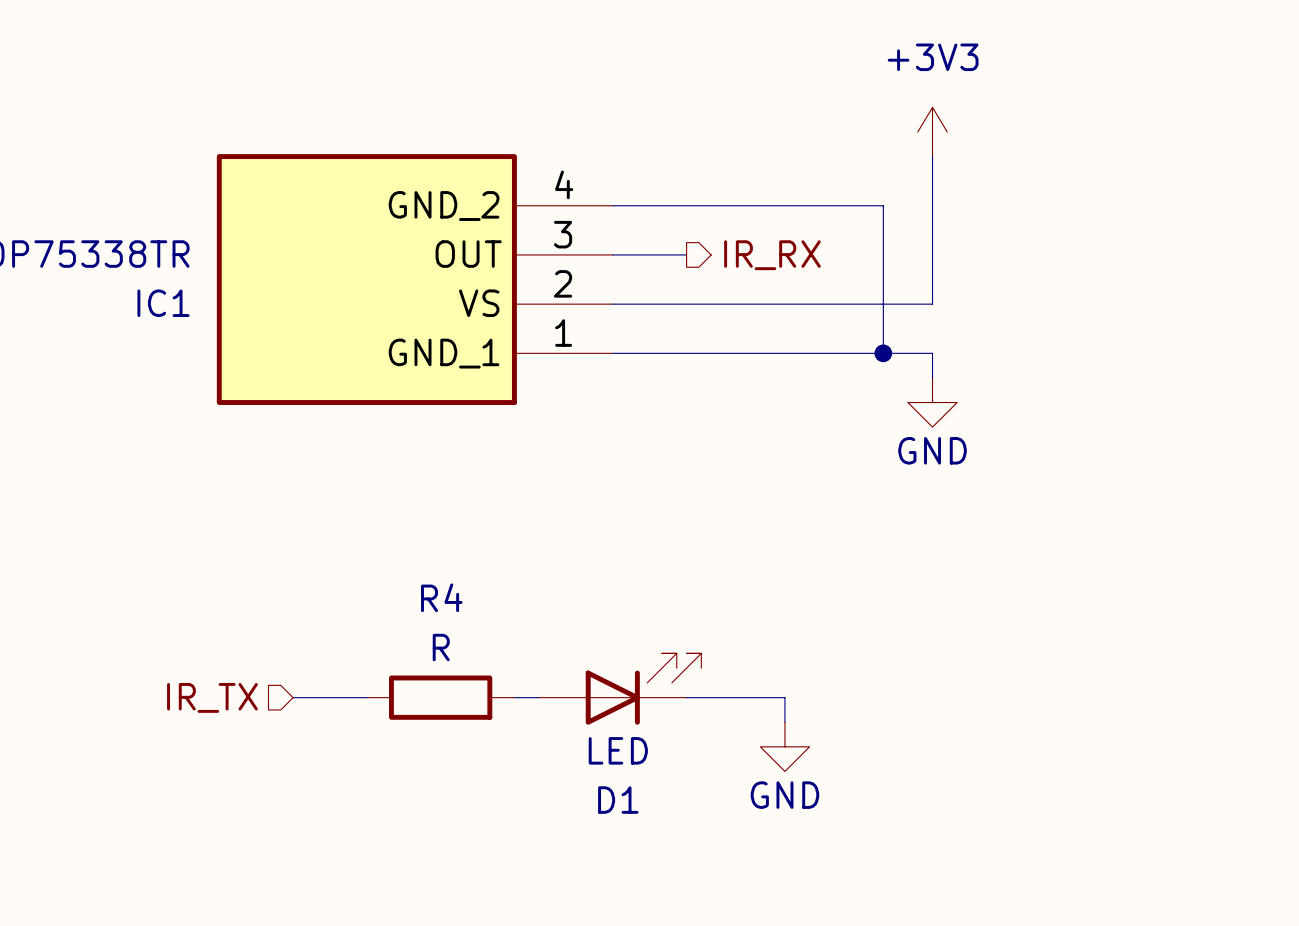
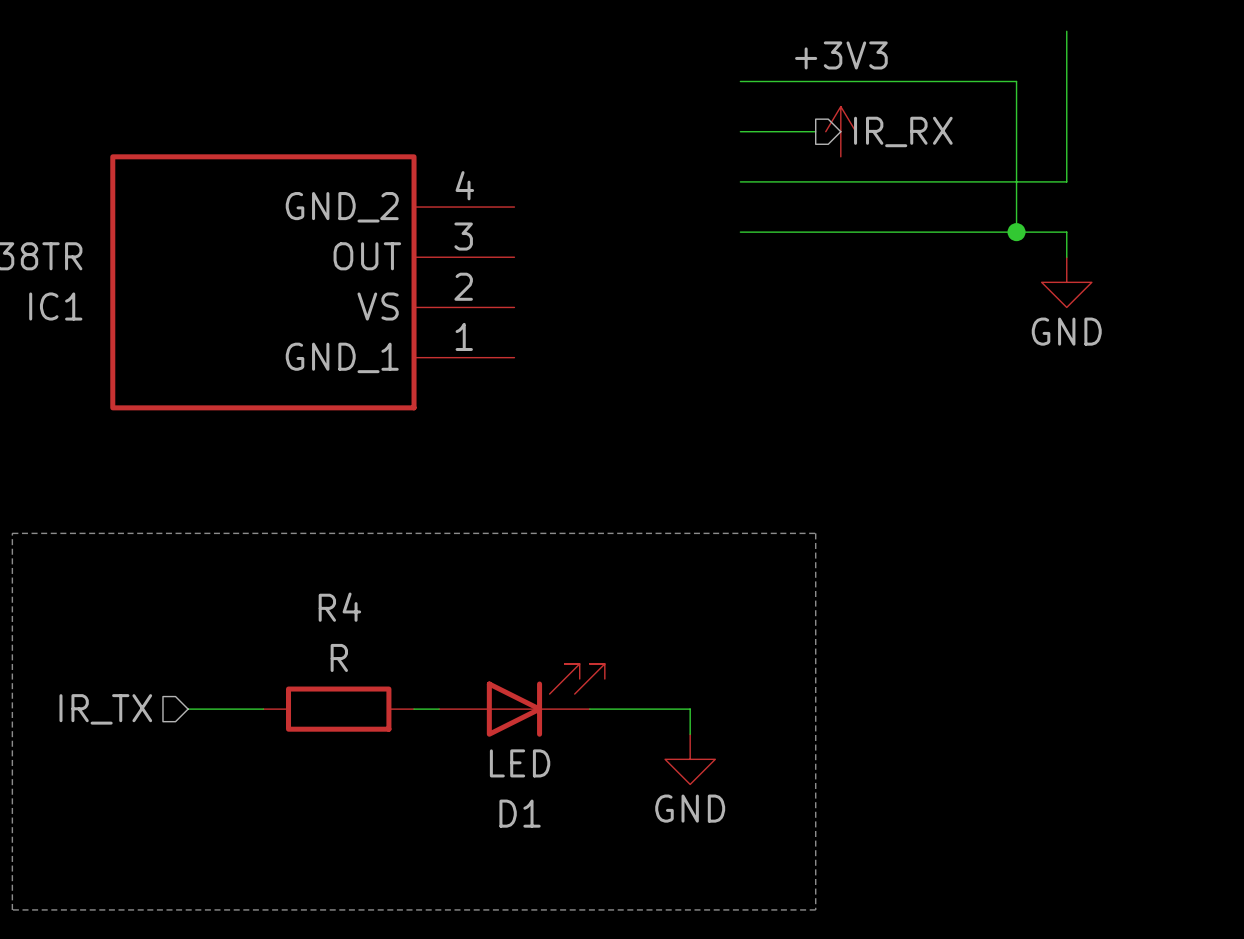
wire: (932, 156) (932, 304) (612, 304) -> (1066, 31) (1066, 181) (740, 181)
wire: (612, 205) (883, 205) (883, 353) -> (740, 81) (1016, 81) (1016, 232)
junction: none -> (1016, 232)
wire: (612, 254) (686, 254) -> (740, 131) (815, 131)
hierarchical label position: IR_RX (772, 255) -> IR_RX (903, 131)
wire: (612, 353) (932, 353) (932, 377) -> (740, 232) (1066, 232) (1066, 257)
junction: (883, 353) -> none
power symbol position: GND (932, 402) -> GND (1066, 282)
line: none -> (12, 533) (815, 533) (815, 909) (12, 909) (12, 533)

